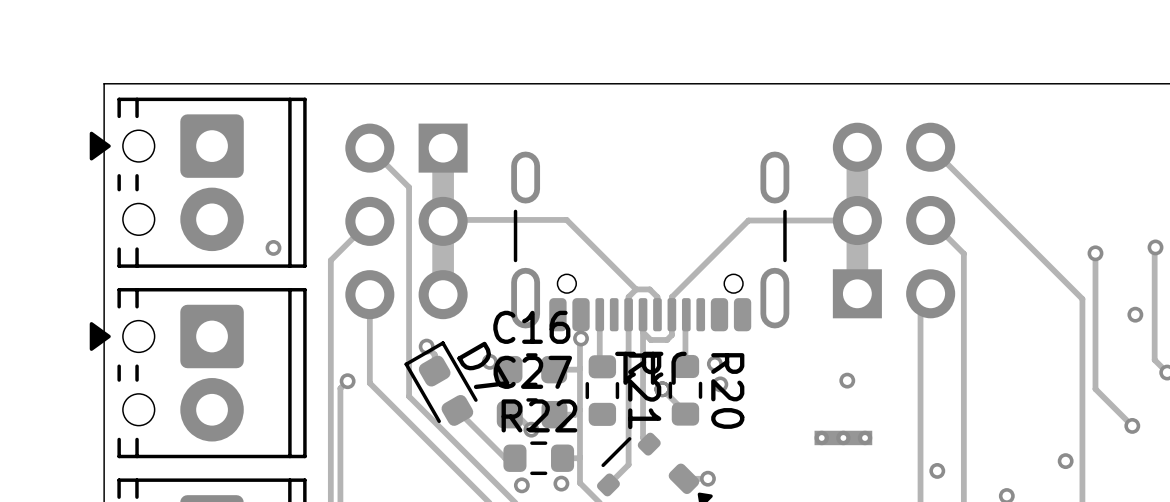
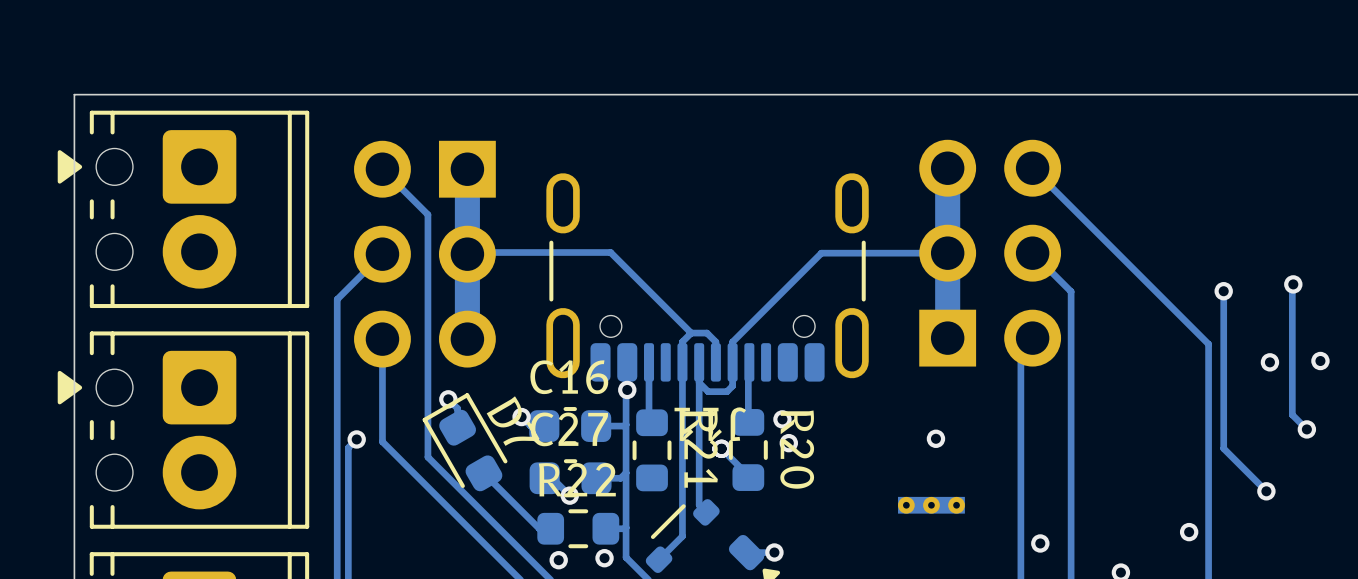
via: (273, 247) -> none

